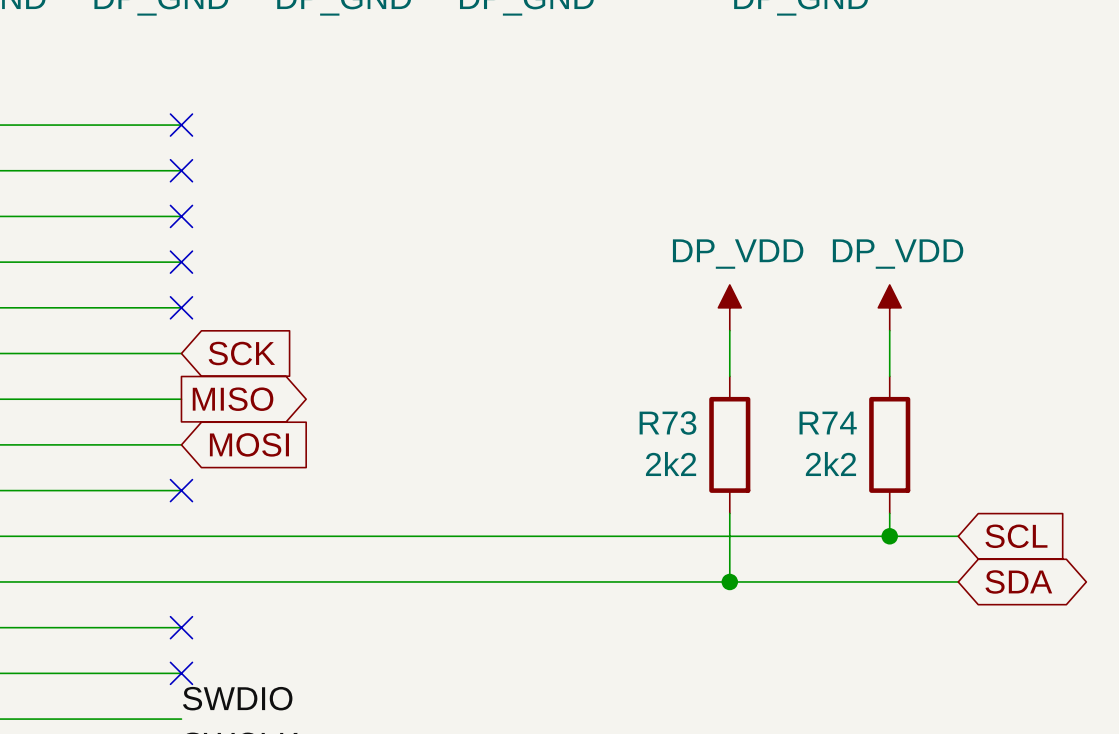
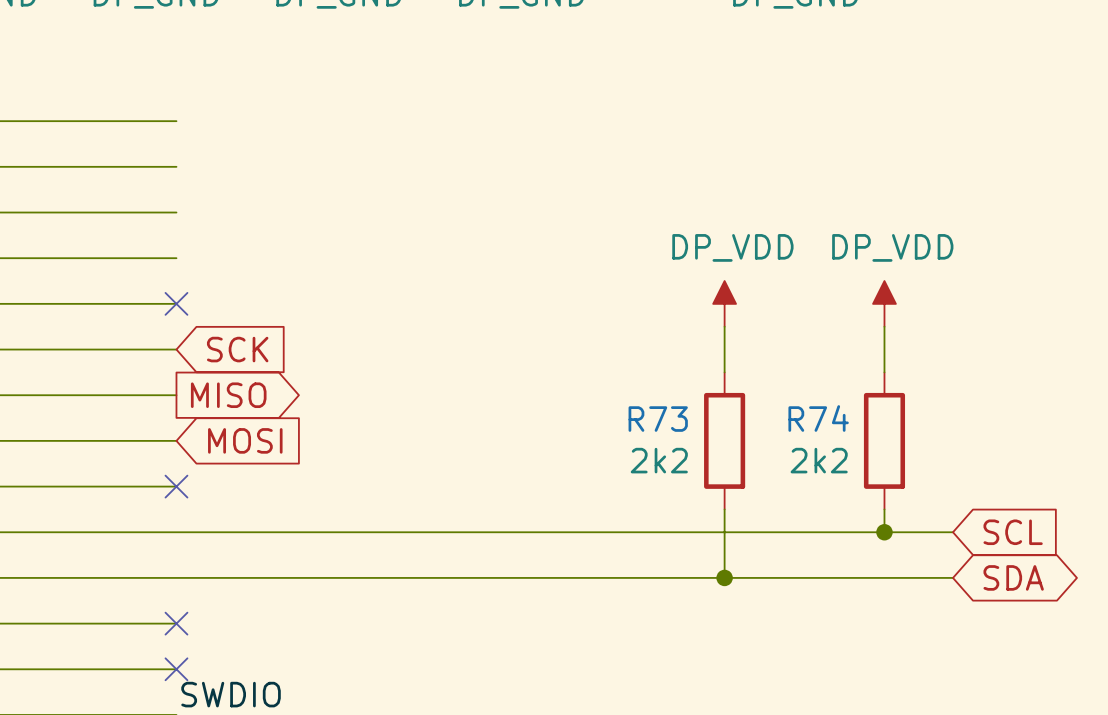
no-connect mark: (181, 125) -> none
no-connect mark: (181, 170) -> none
no-connect mark: (181, 216) -> none
no-connect mark: (181, 262) -> none

